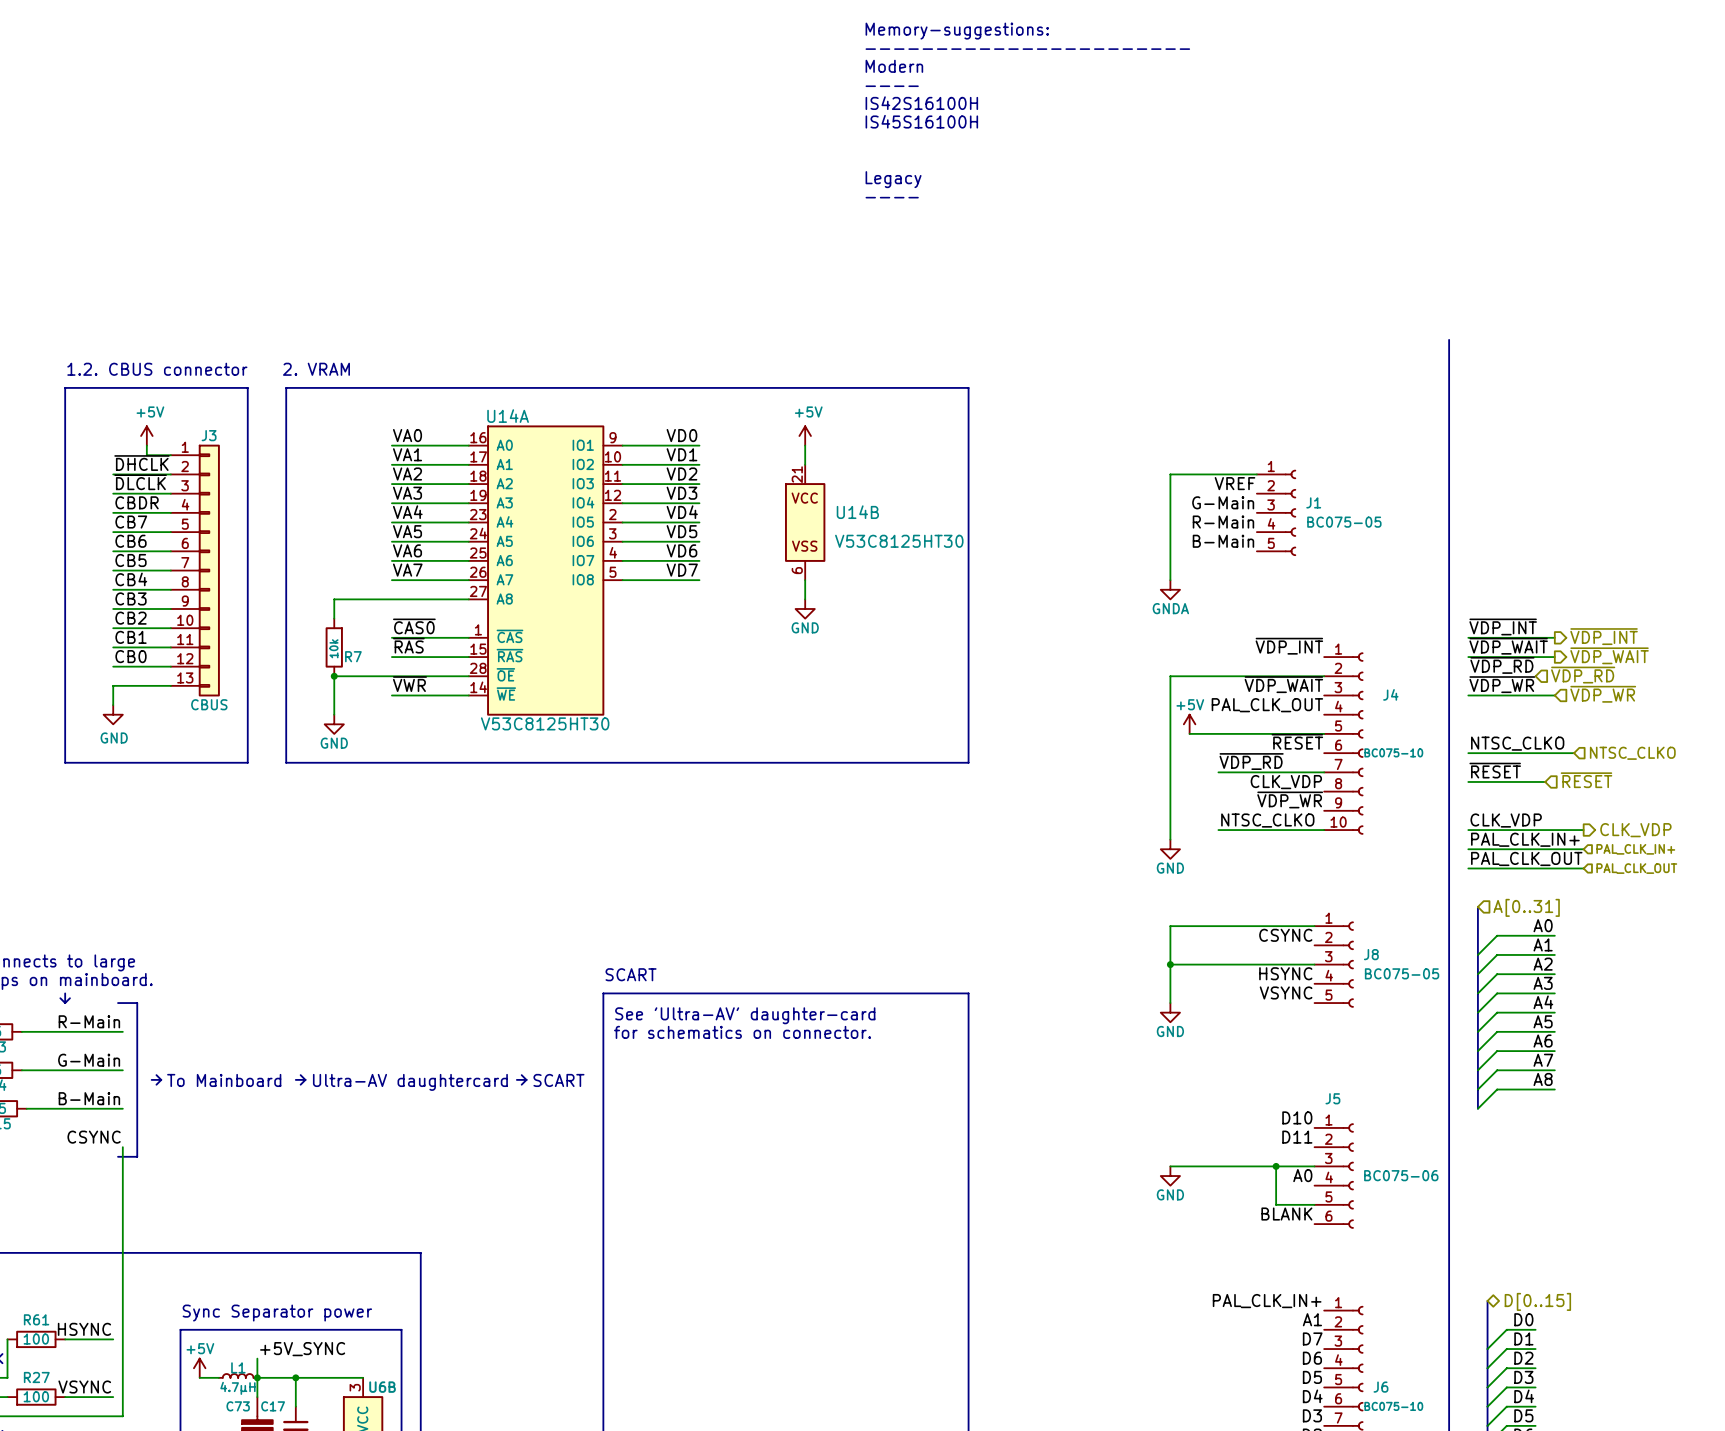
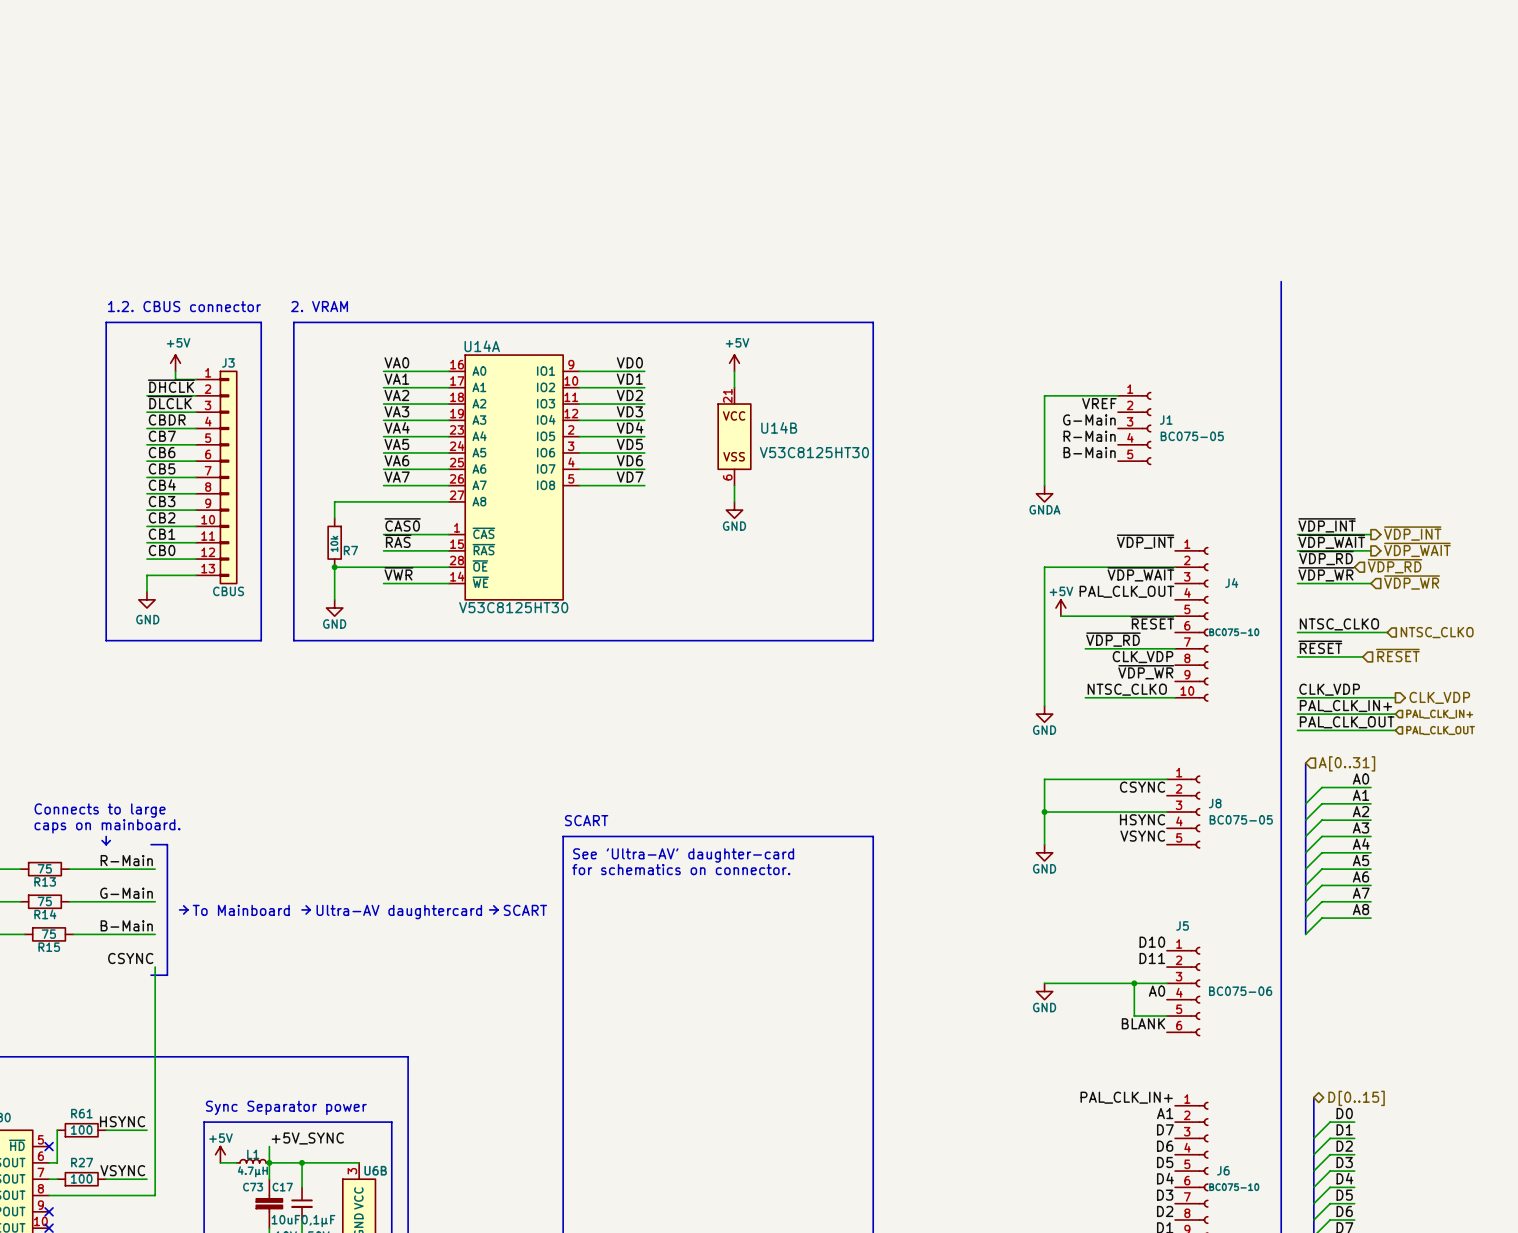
text: Memory-suggestions: (957, 31) -> none
text: ----------------------- (1027, 49) -> none
text: Modern (894, 66) -> none
text: ---- (892, 86) -> none
text: IS42S16100H (921, 103) -> none
text: IS45S16100H (921, 121) -> none
text: Legacy (893, 179) -> none
text: ---- (892, 197) -> none

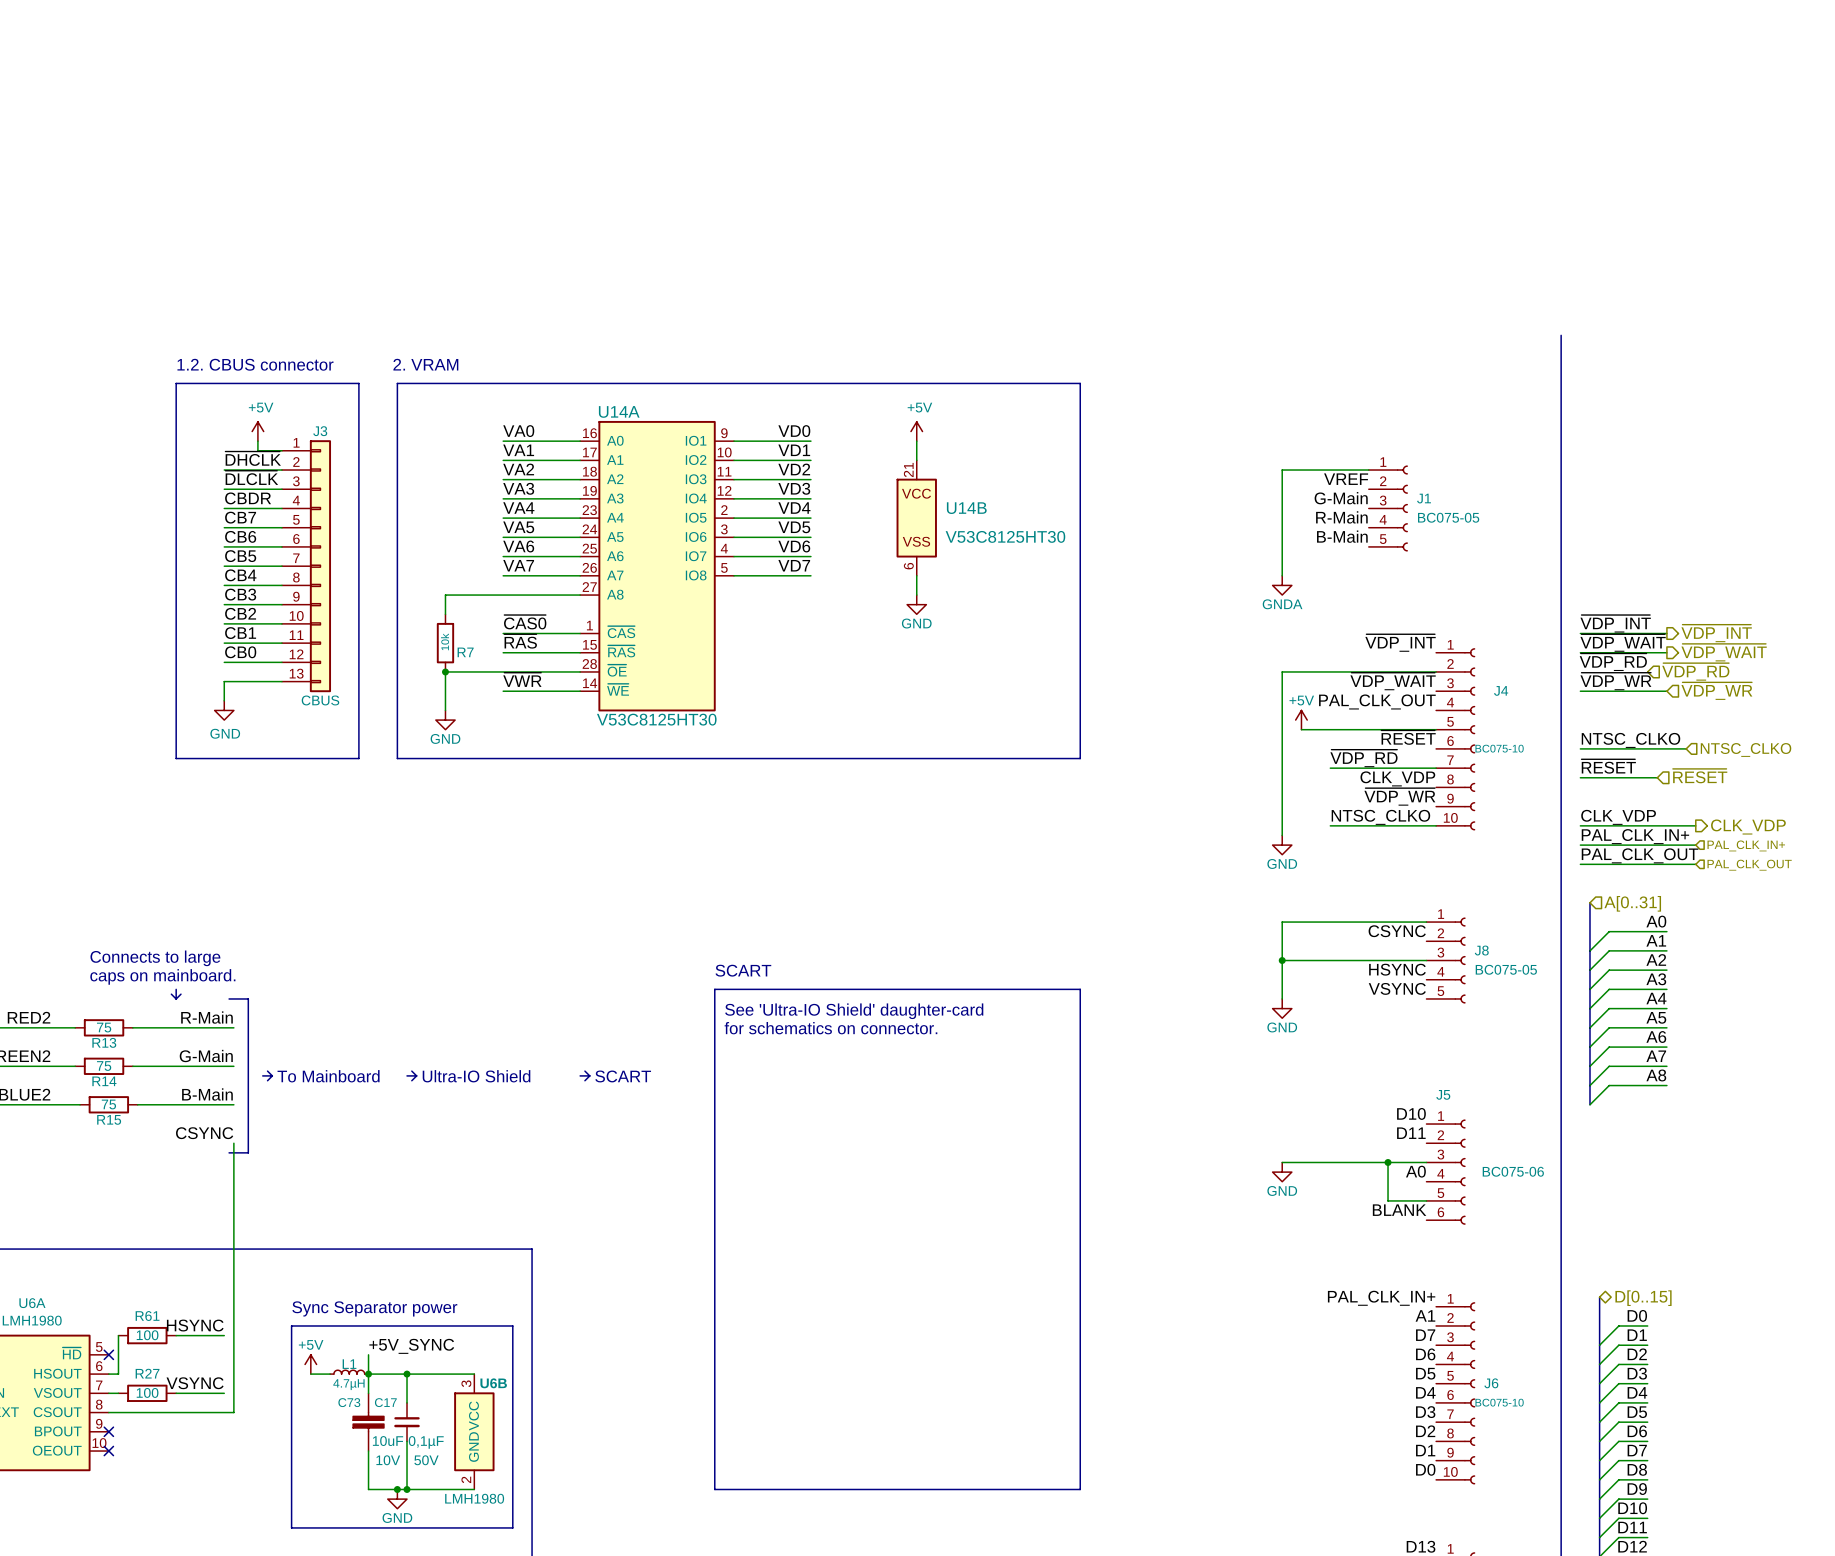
text: See 'Ultra-AV' daughter-card (683, 855) -> See 'Ultra-IO Shield' daughter-card (854, 1011)
line: (493, 905) (497, 909) -> (584, 1071) (589, 1075)
line: (489, 909) (497, 909) -> (580, 1075) (589, 1075)
line: (497, 909) (493, 914) -> (589, 1075) (584, 1080)
text position: SCART (525, 910) -> SCART (623, 1076)
text: Ultra-AV daughtercard (399, 912) -> Ultra-IO Shield (476, 1076)

